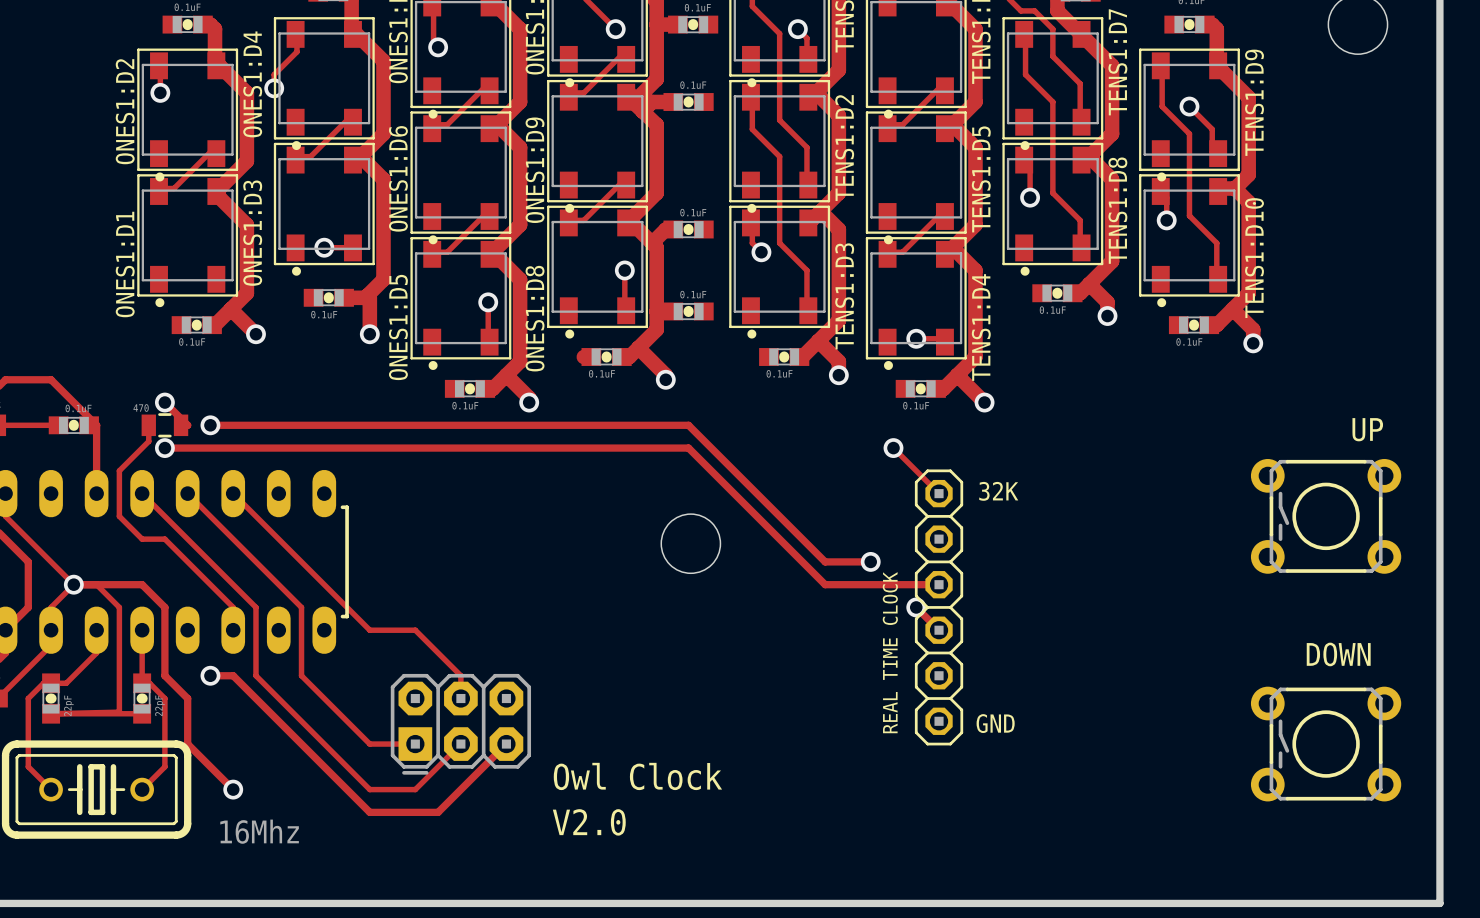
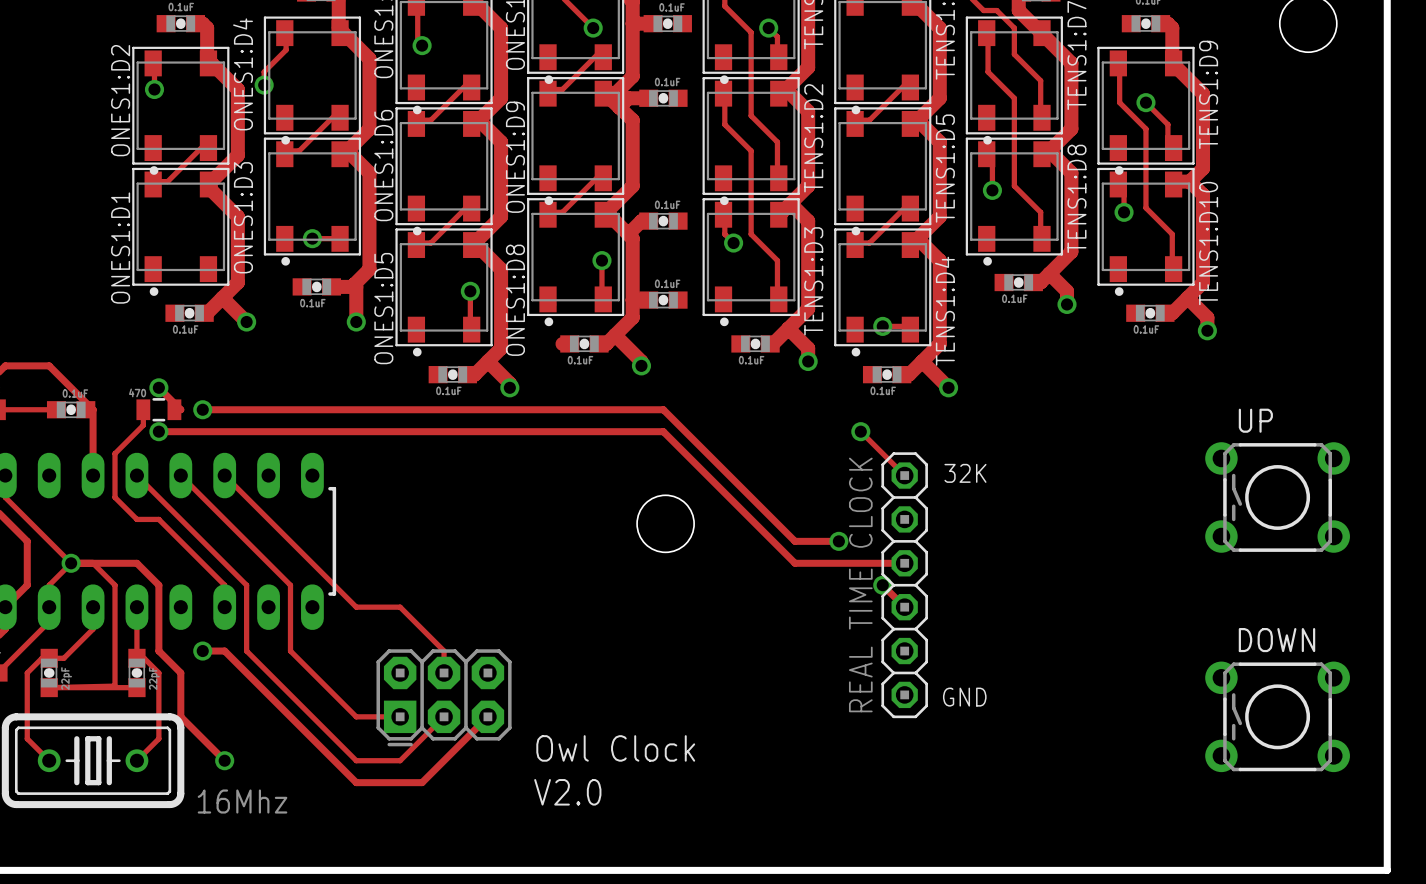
text: UP (1367, 429) -> none
UP name: none -> UP (1255, 420)
part value: none -> REAL TIME CLOCK (860, 584)
text: REAL TIME CLOCK (890, 652) -> none
text: DOWN (1338, 654) -> none
DOWN name: none -> DOWN (1276, 640)

